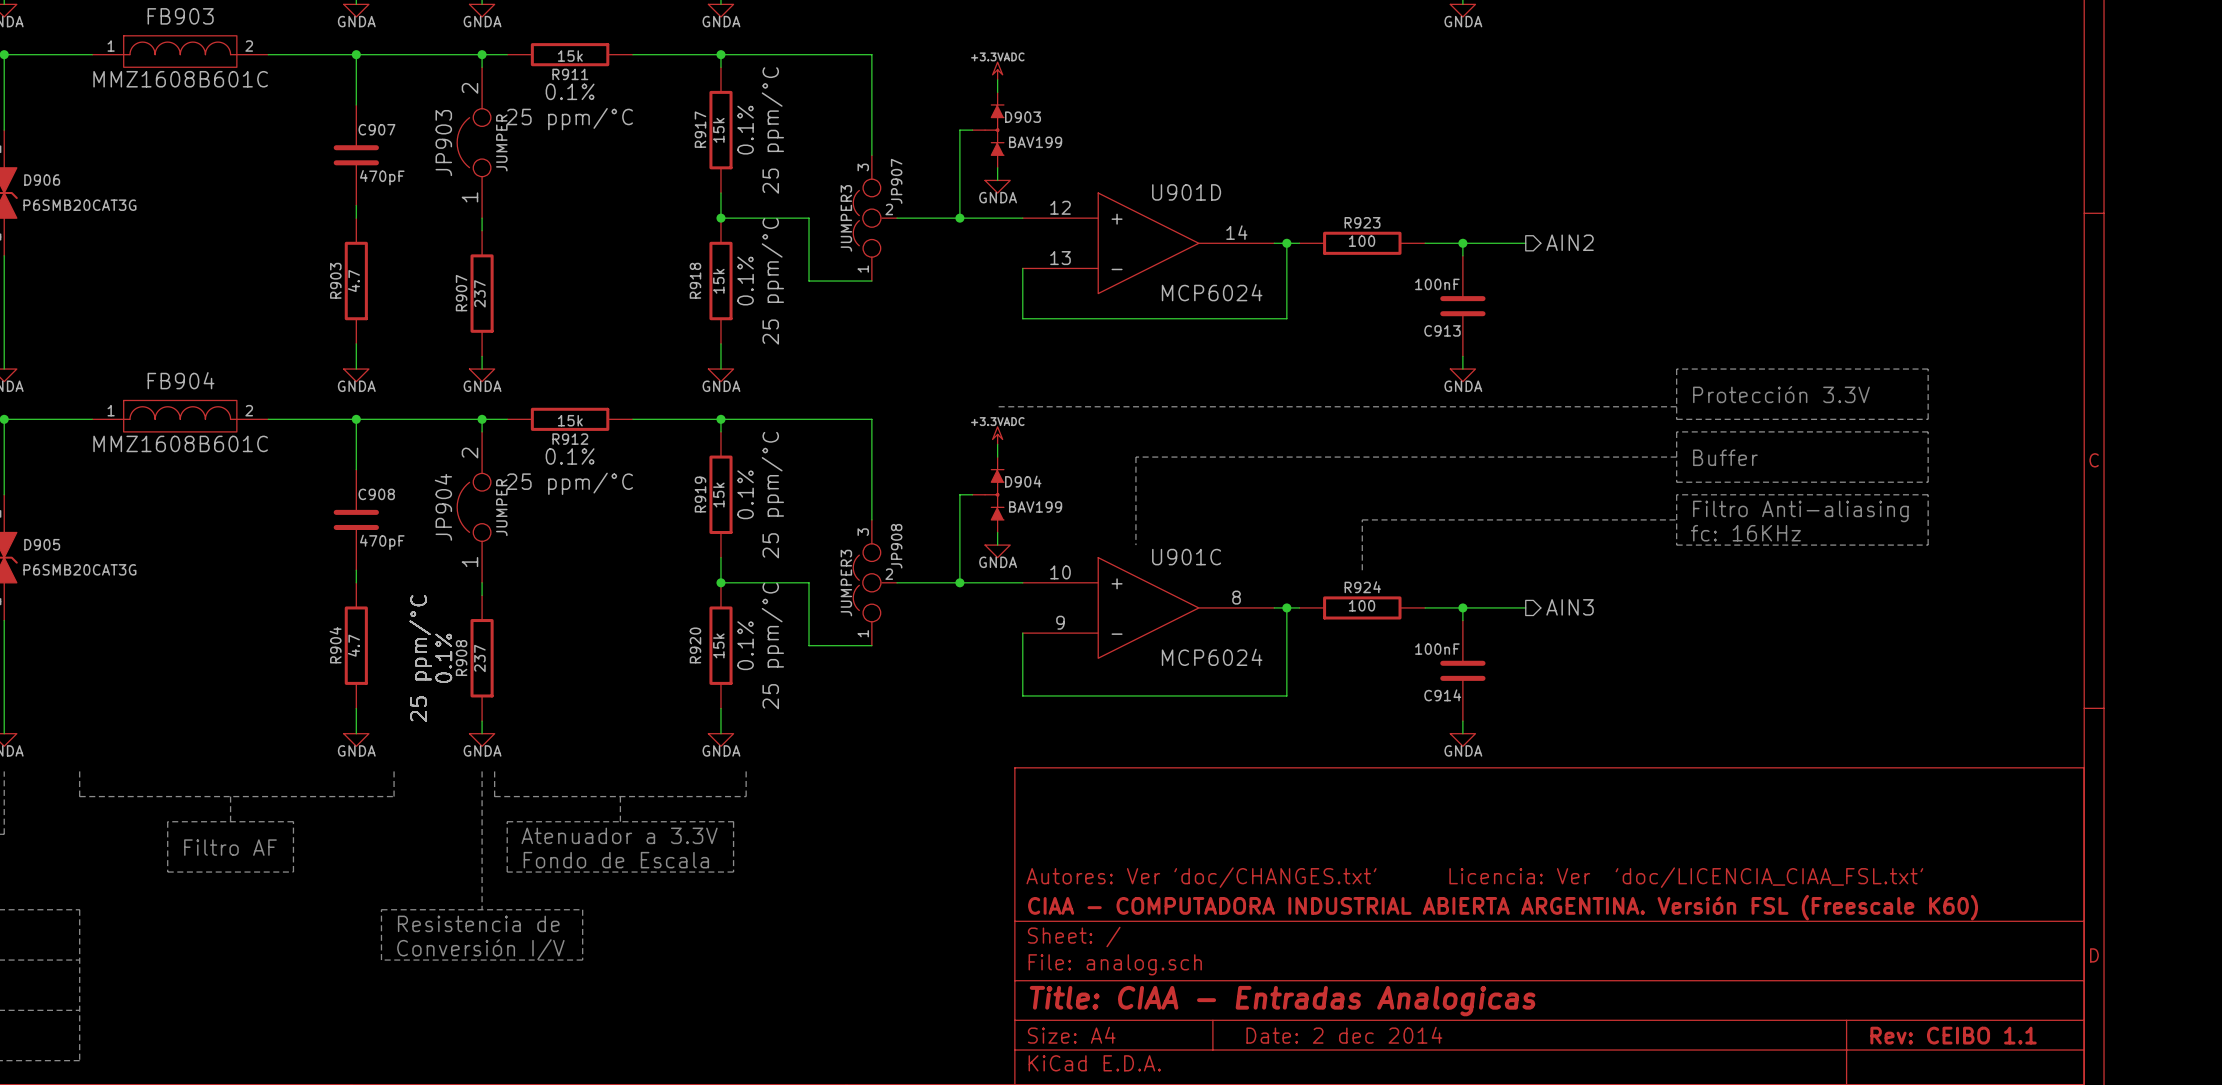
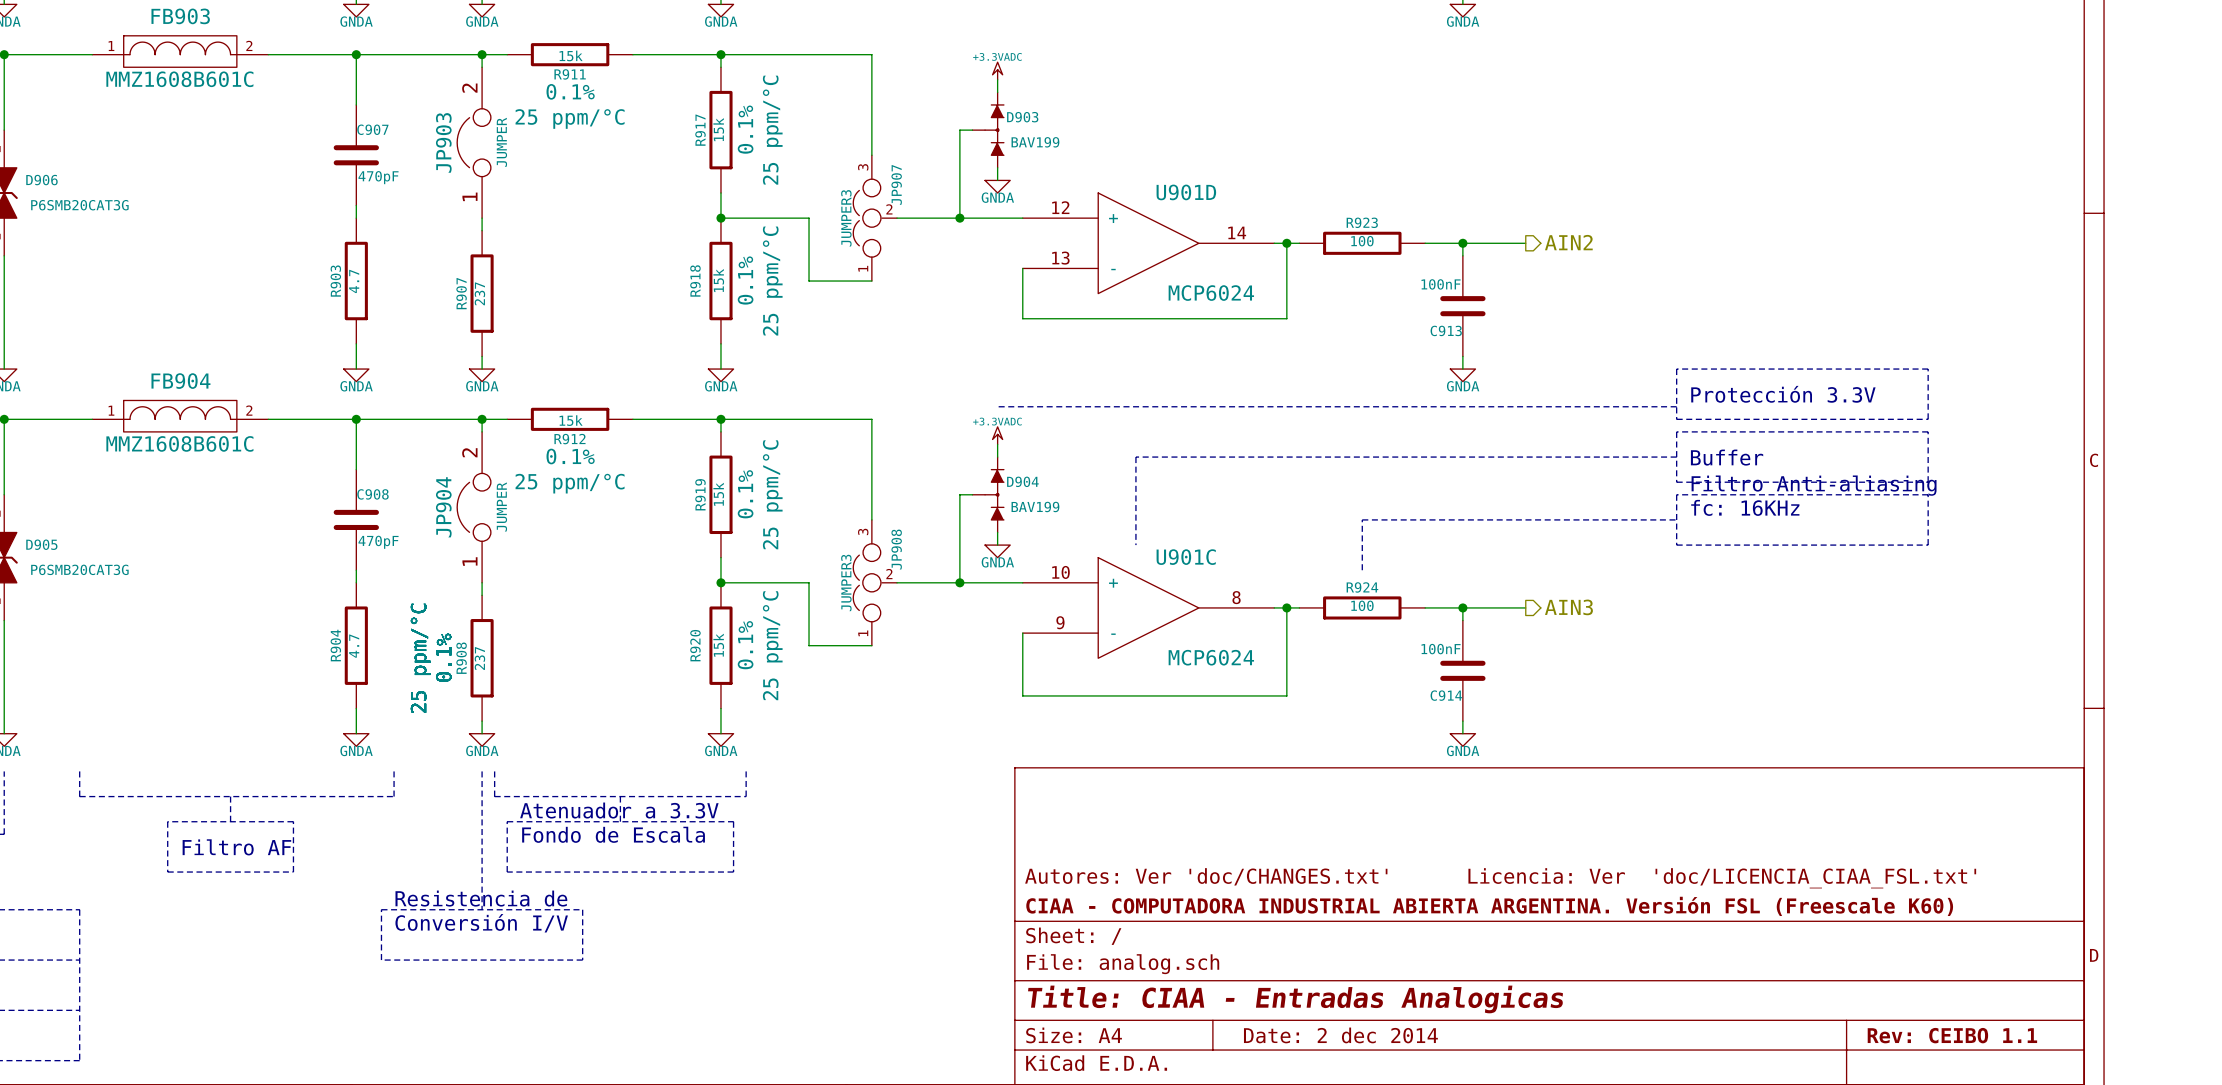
text: none -> Filtro Anti-aliasing (1814, 485)
text: Filtro Anti-aliasing (1800, 511) -> fc: 16KHz (1745, 507)
text: fc: 16KHz (1745, 533) -> none
text: none -> Atenuador a 3.3V (619, 810)
text: Atenuador a 3.3V (619, 835) -> Fondo de Escala (613, 834)
text: Fondo de Escala (616, 860) -> none
text: none -> Resistencia de (481, 898)
text: Resistencia de (478, 923) -> Conversión I/V (481, 923)
text: Conversión I/V (480, 949) -> none

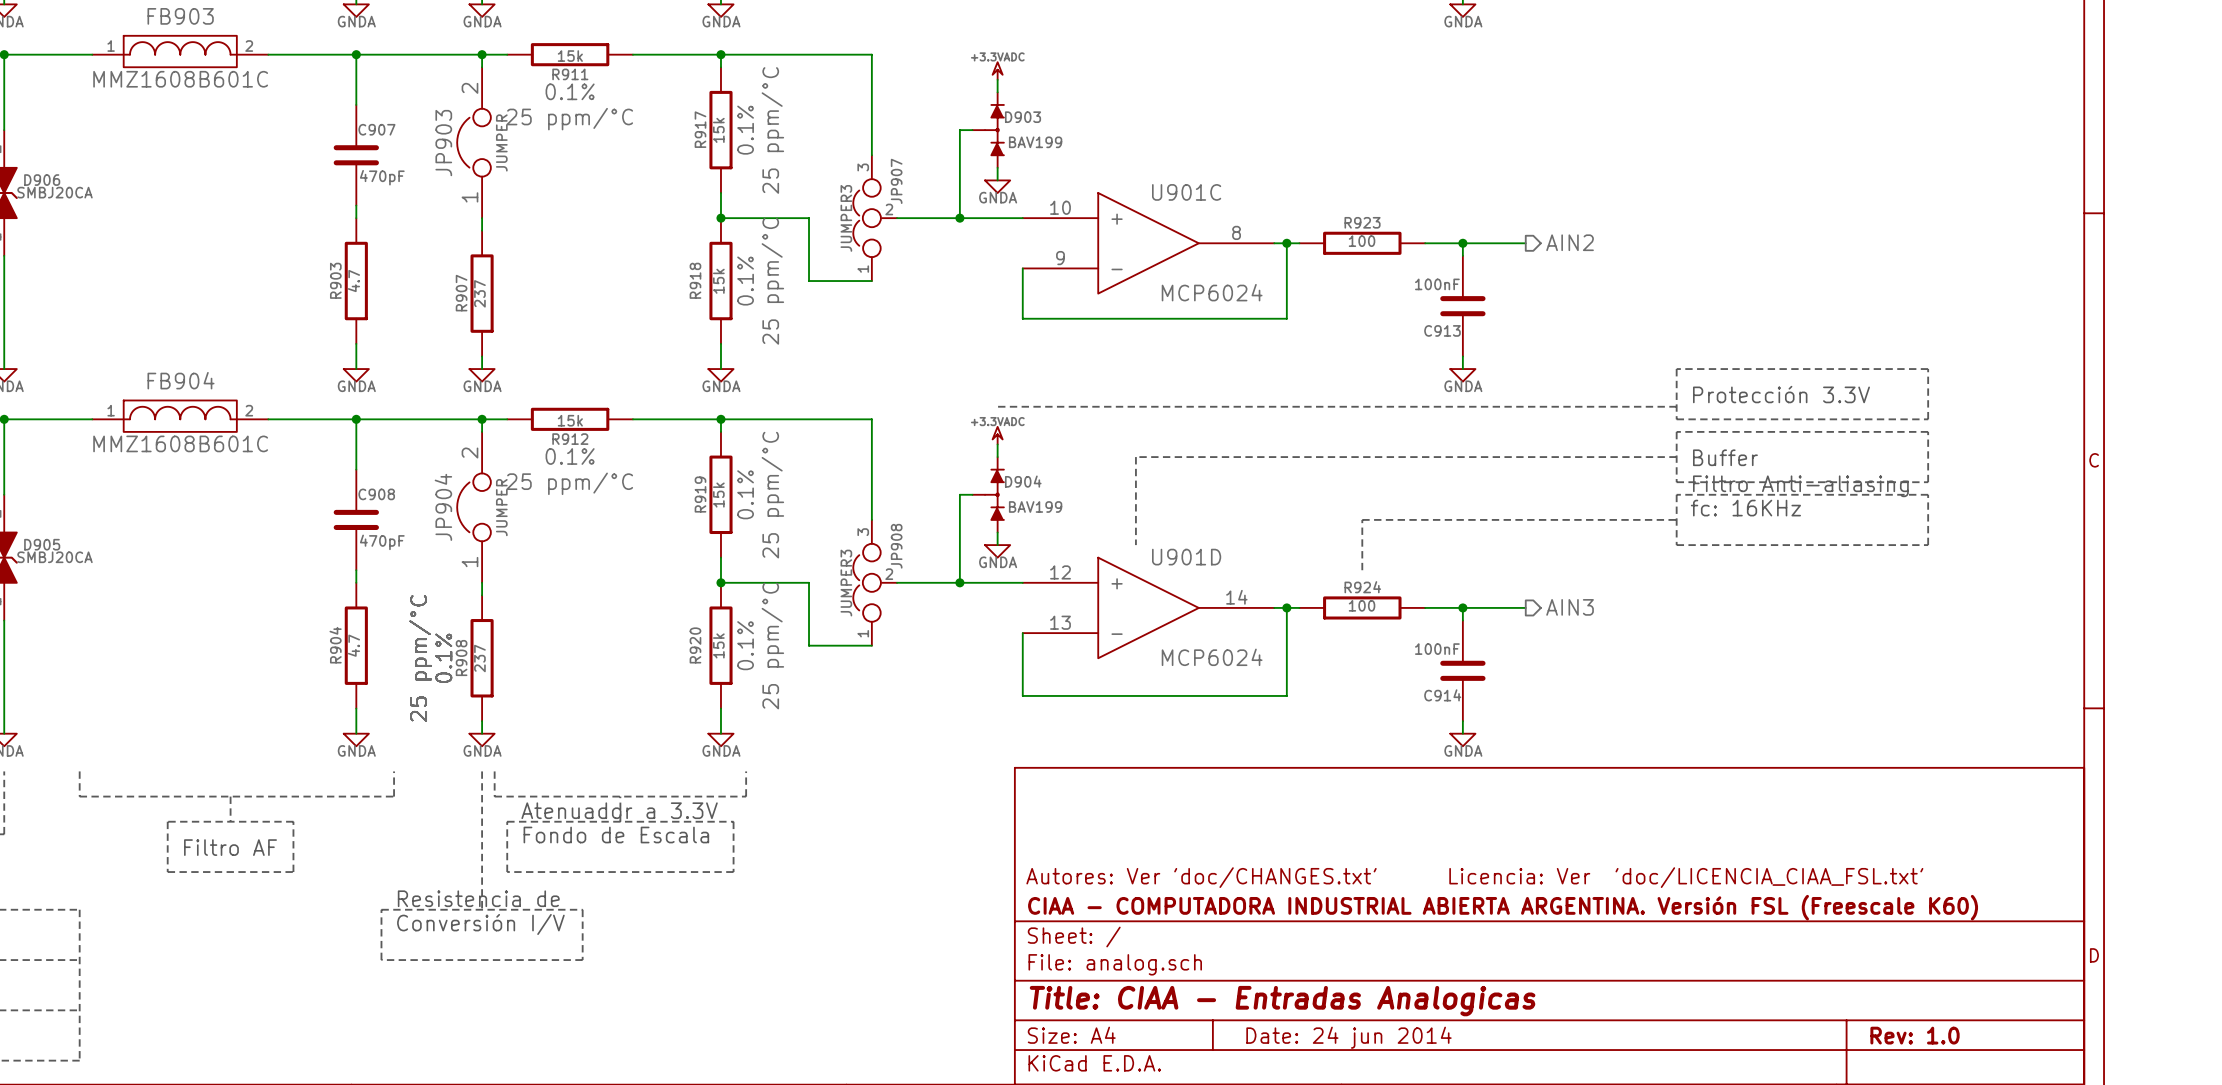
D906 value: P6SMB20CAT3G (79, 205) -> SMBJ20CA (55, 192)
U901D position: (1148, 243) -> (1148, 607)
D905 value: P6SMB20CAT3G (79, 569) -> SMBJ20CA (55, 557)
U901C position: (1148, 607) -> (1148, 243)
title block: Date: 2 dec 2014 (1340, 1035) -> Date: 24 jun 2014 (1348, 1037)
title block: Rev: CEIBO 1.1 (1952, 1035) -> Rev: 1.0 (1915, 1035)

